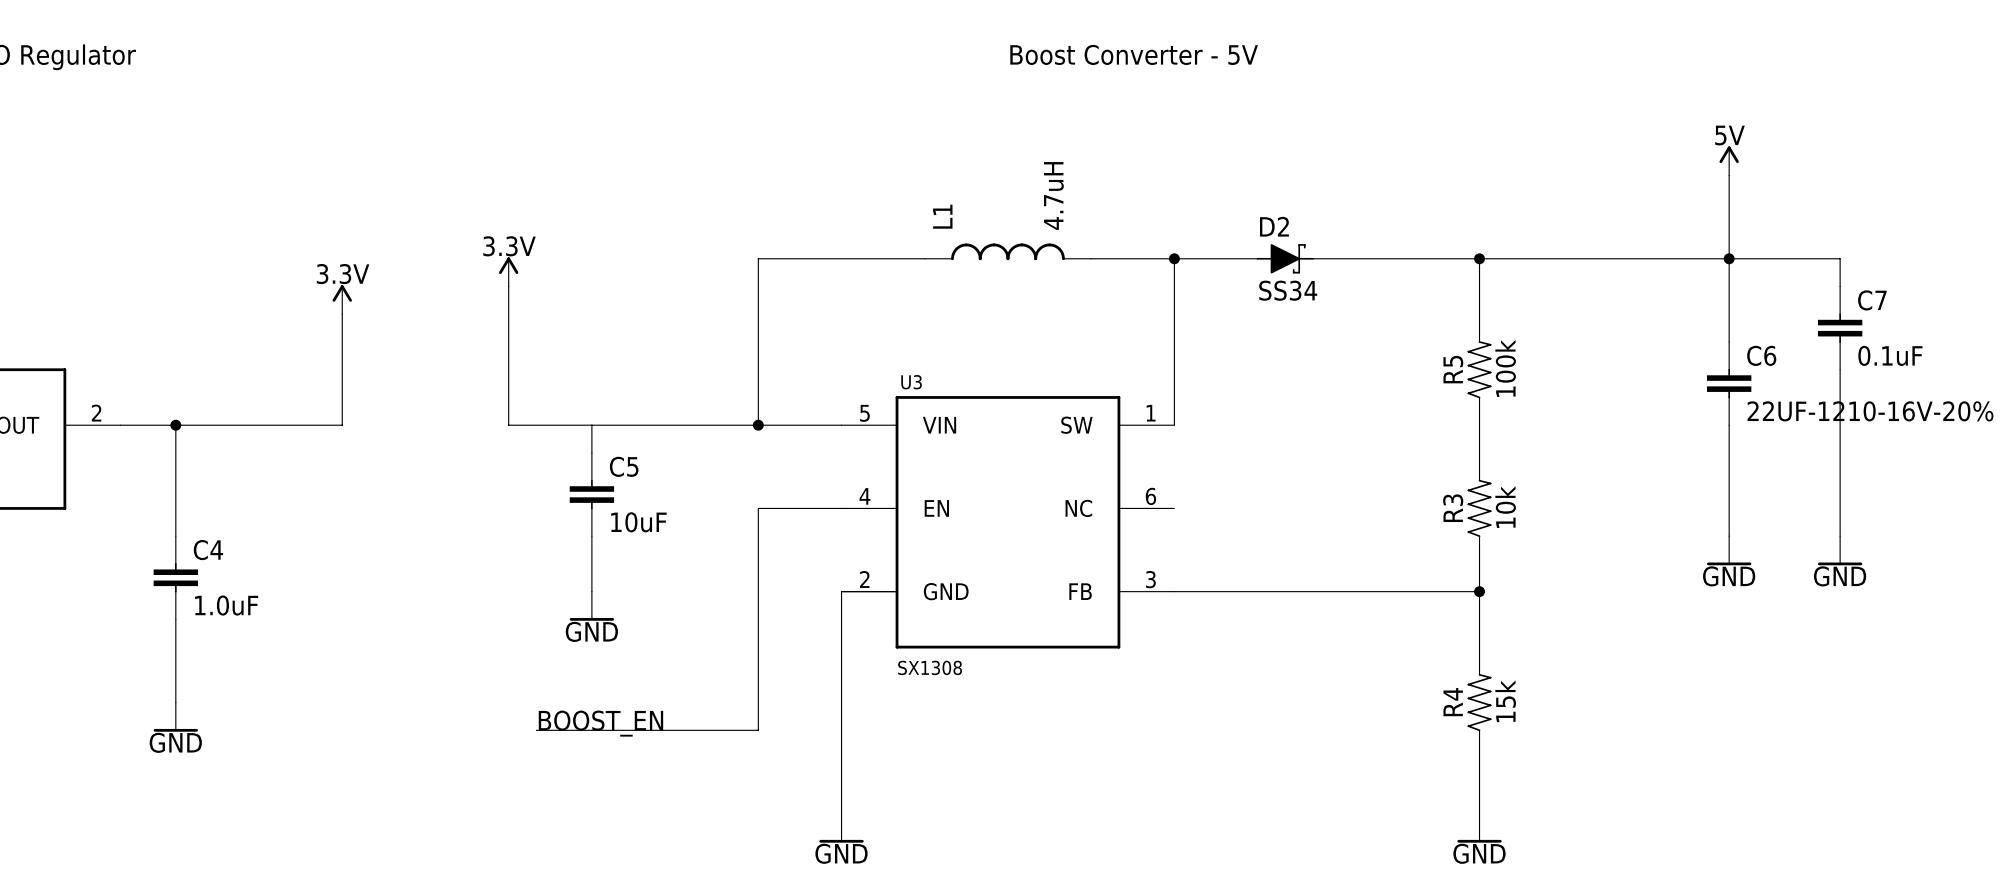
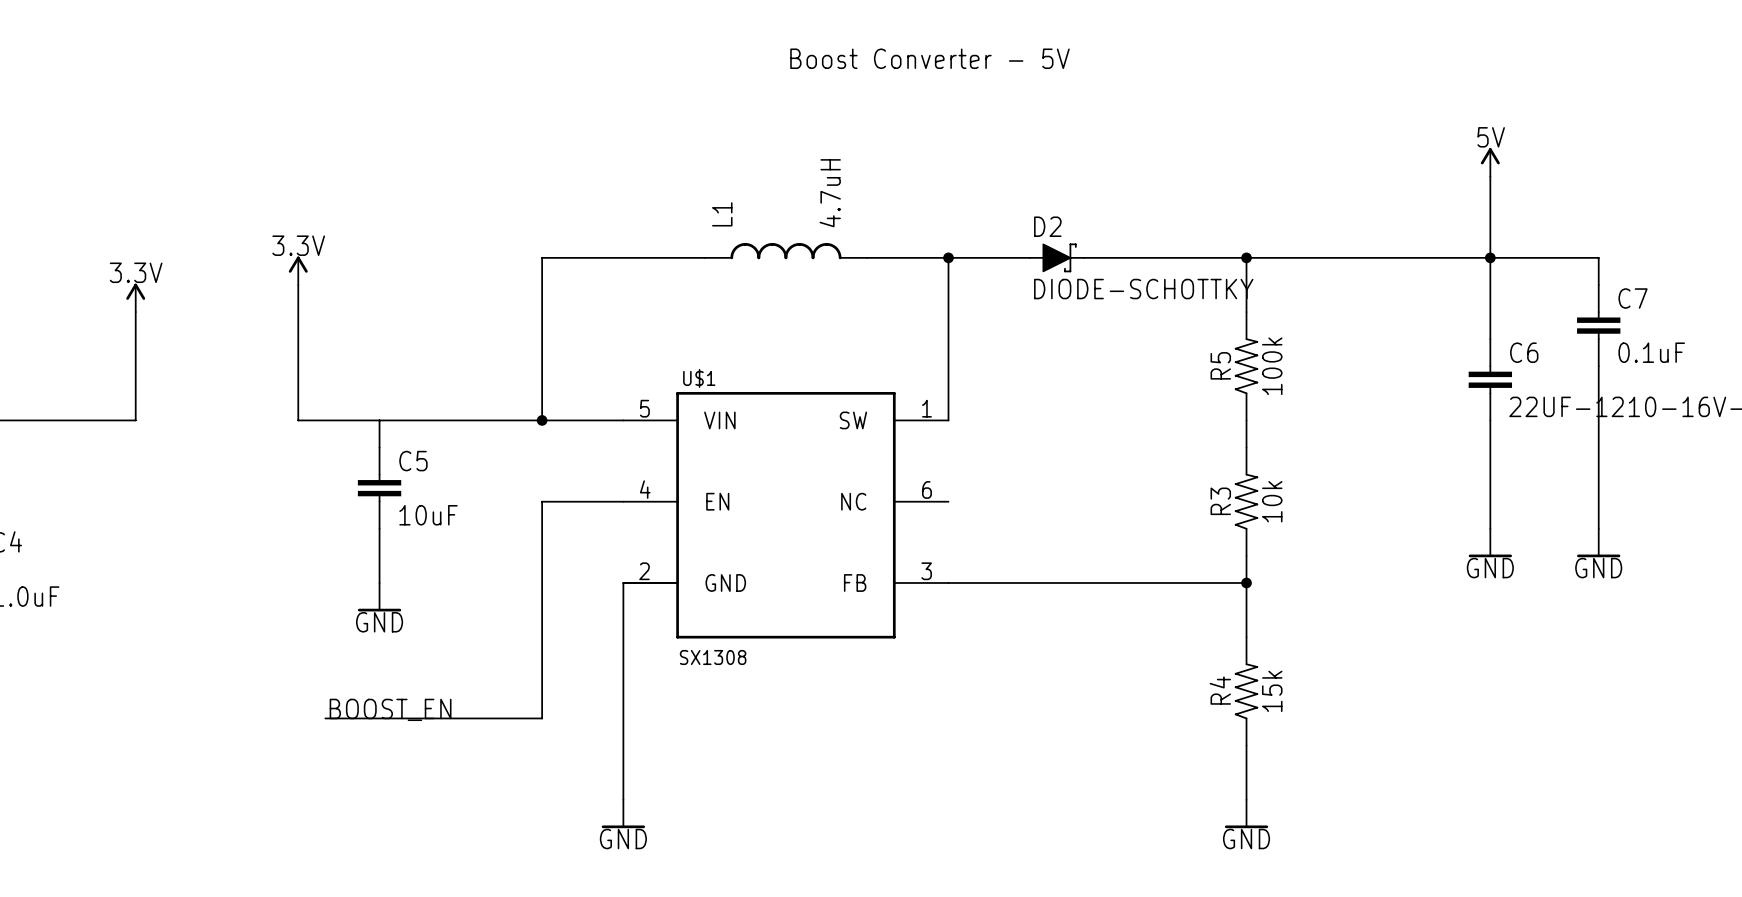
D2 value: SS34 (1288, 290) -> DIODE-SCHOTTKY (1143, 289)
U3 name: U3 (911, 382) -> U$1 (699, 378)

